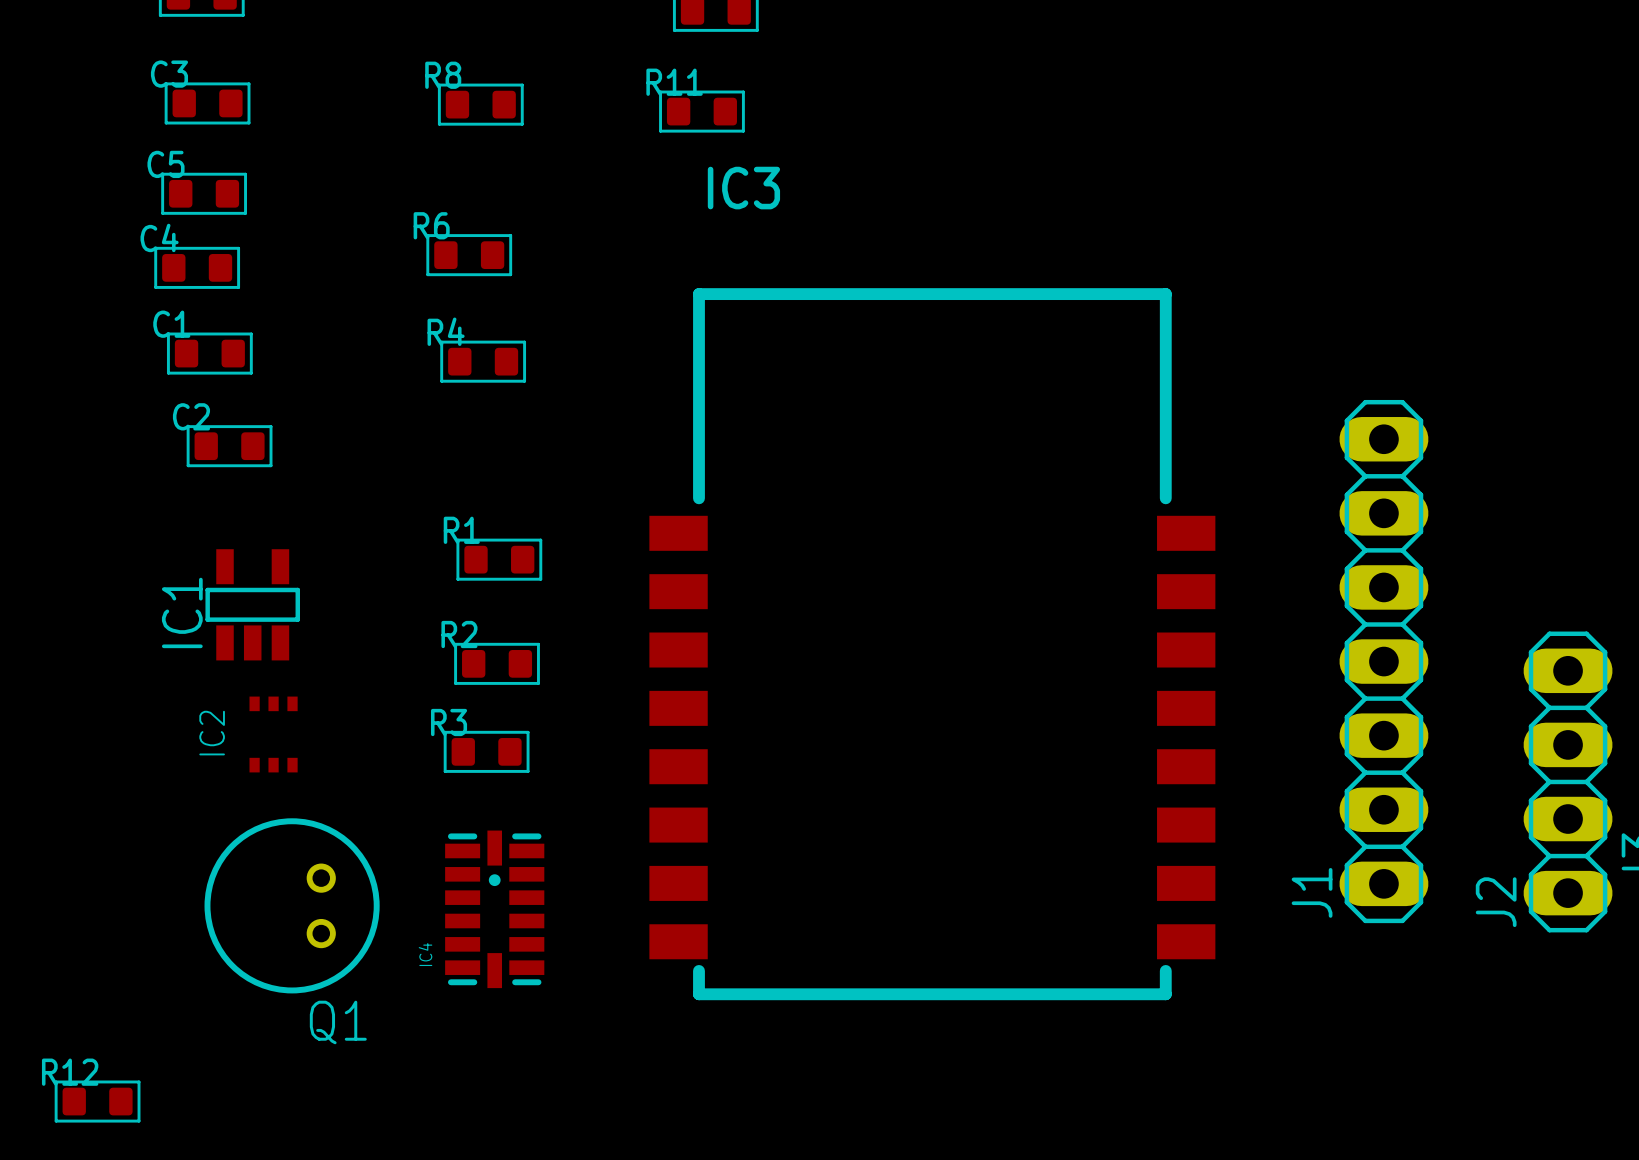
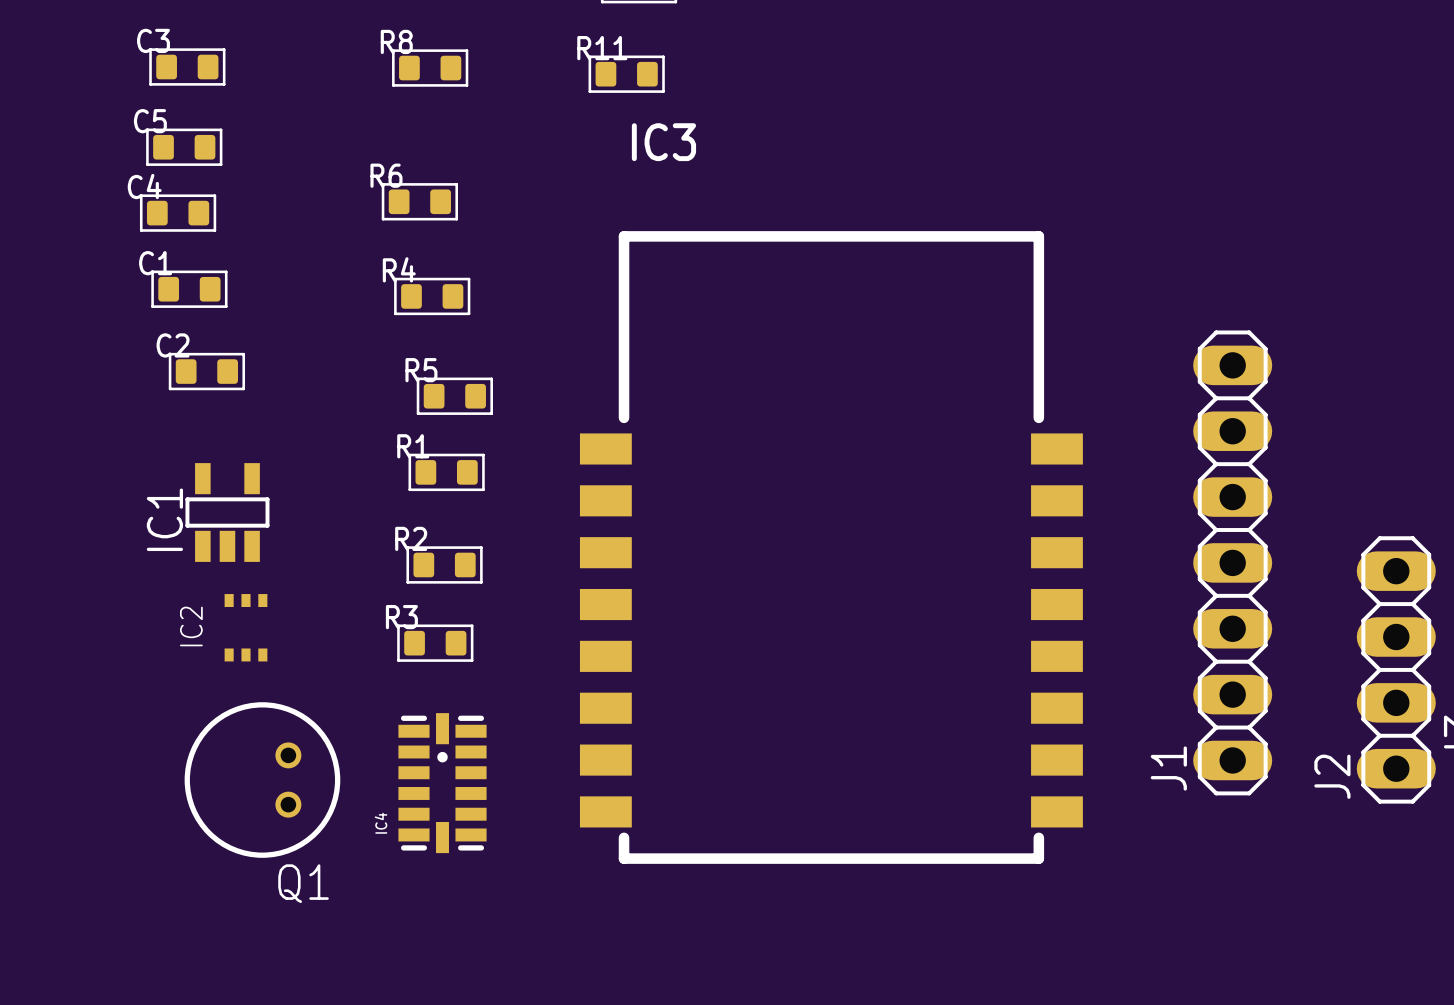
R5: none -> (454, 396)
R12: (97, 1101) -> none

